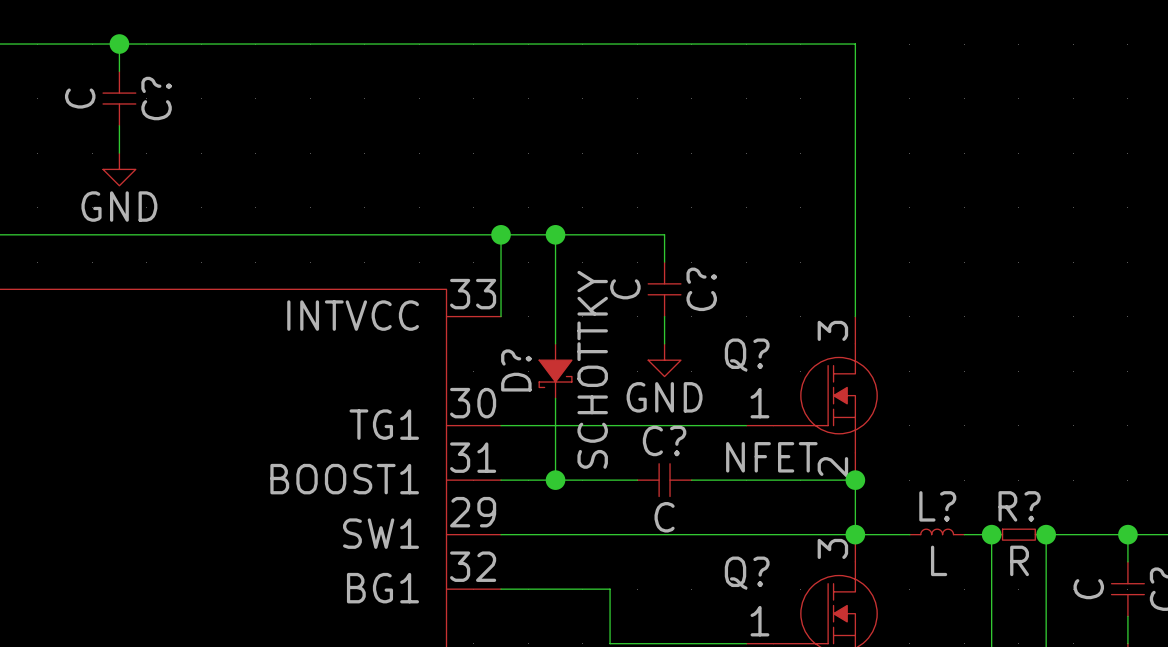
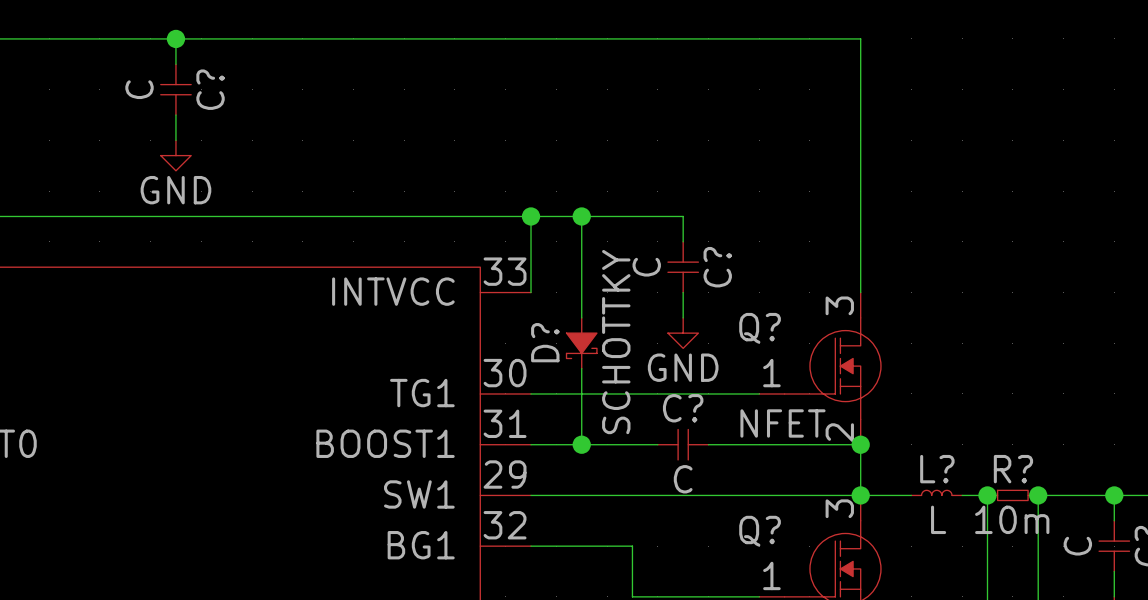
R? value: R (1019, 560) -> 10m (1012, 519)

